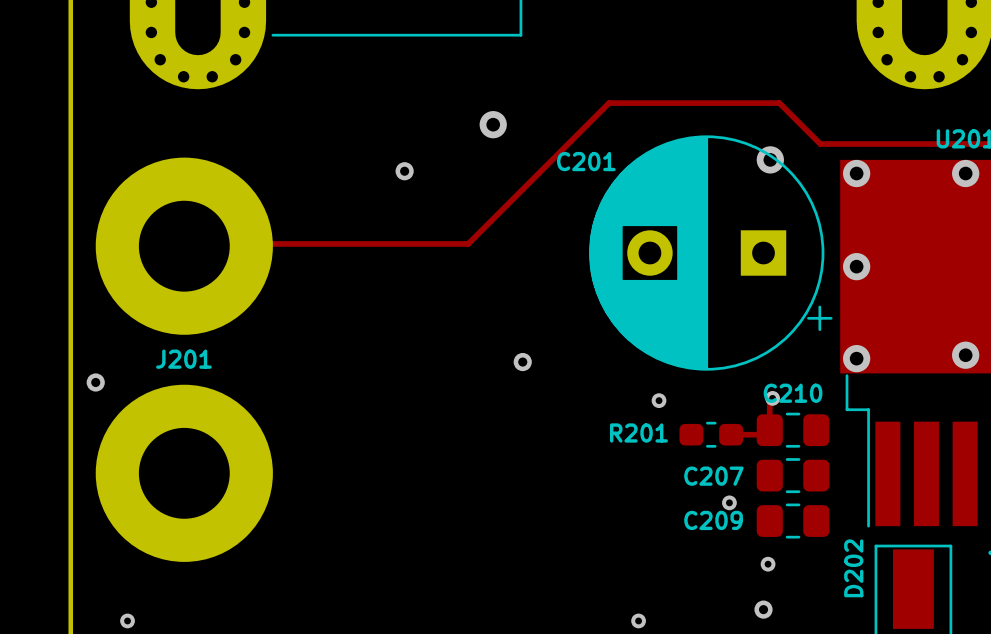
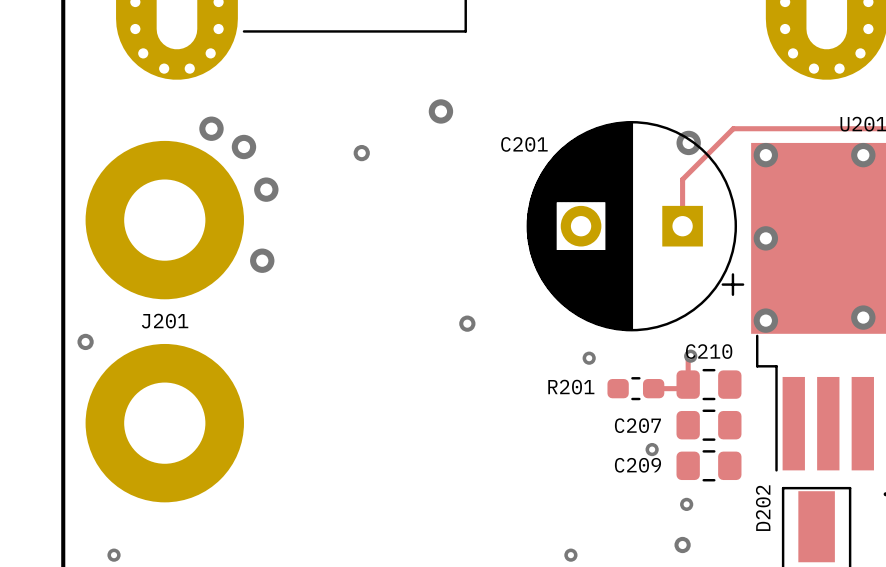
via: none -> (211, 128)
track: (820, 143) (779, 103) (609, 103) (468, 243) (266, 243) (263, 246) (184, 246) -> (733, 128) (682, 179) (682, 226)
via: none -> (243, 147)
via: none -> (266, 189)
via: none -> (262, 260)

